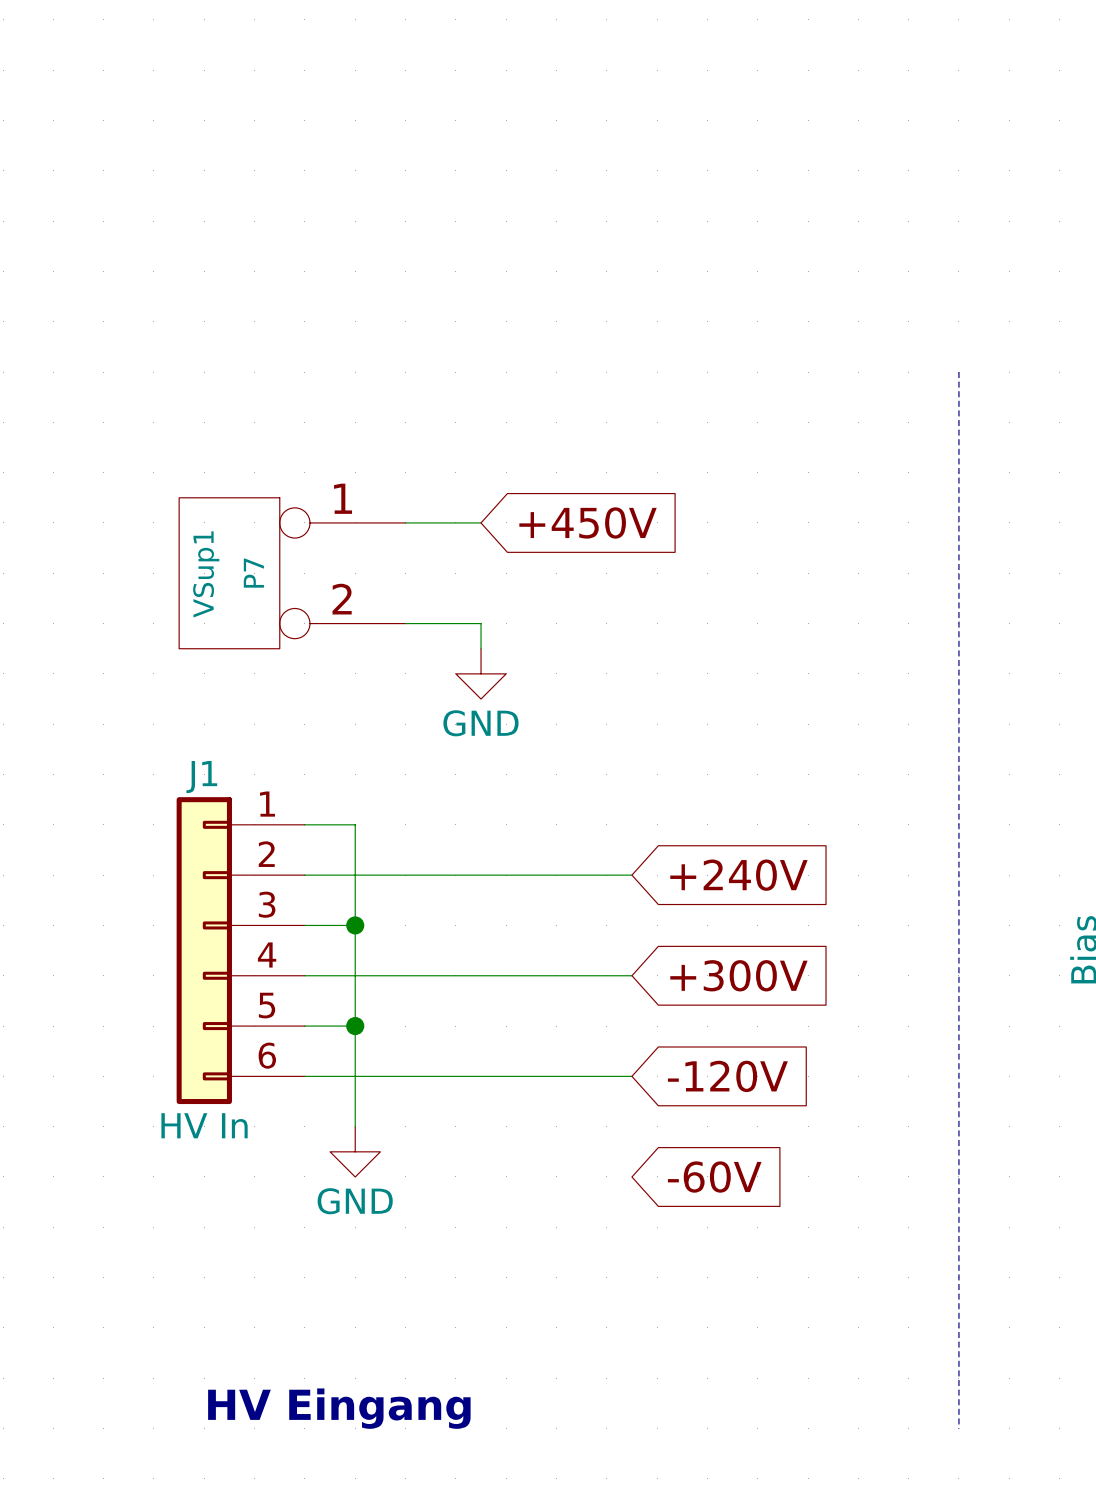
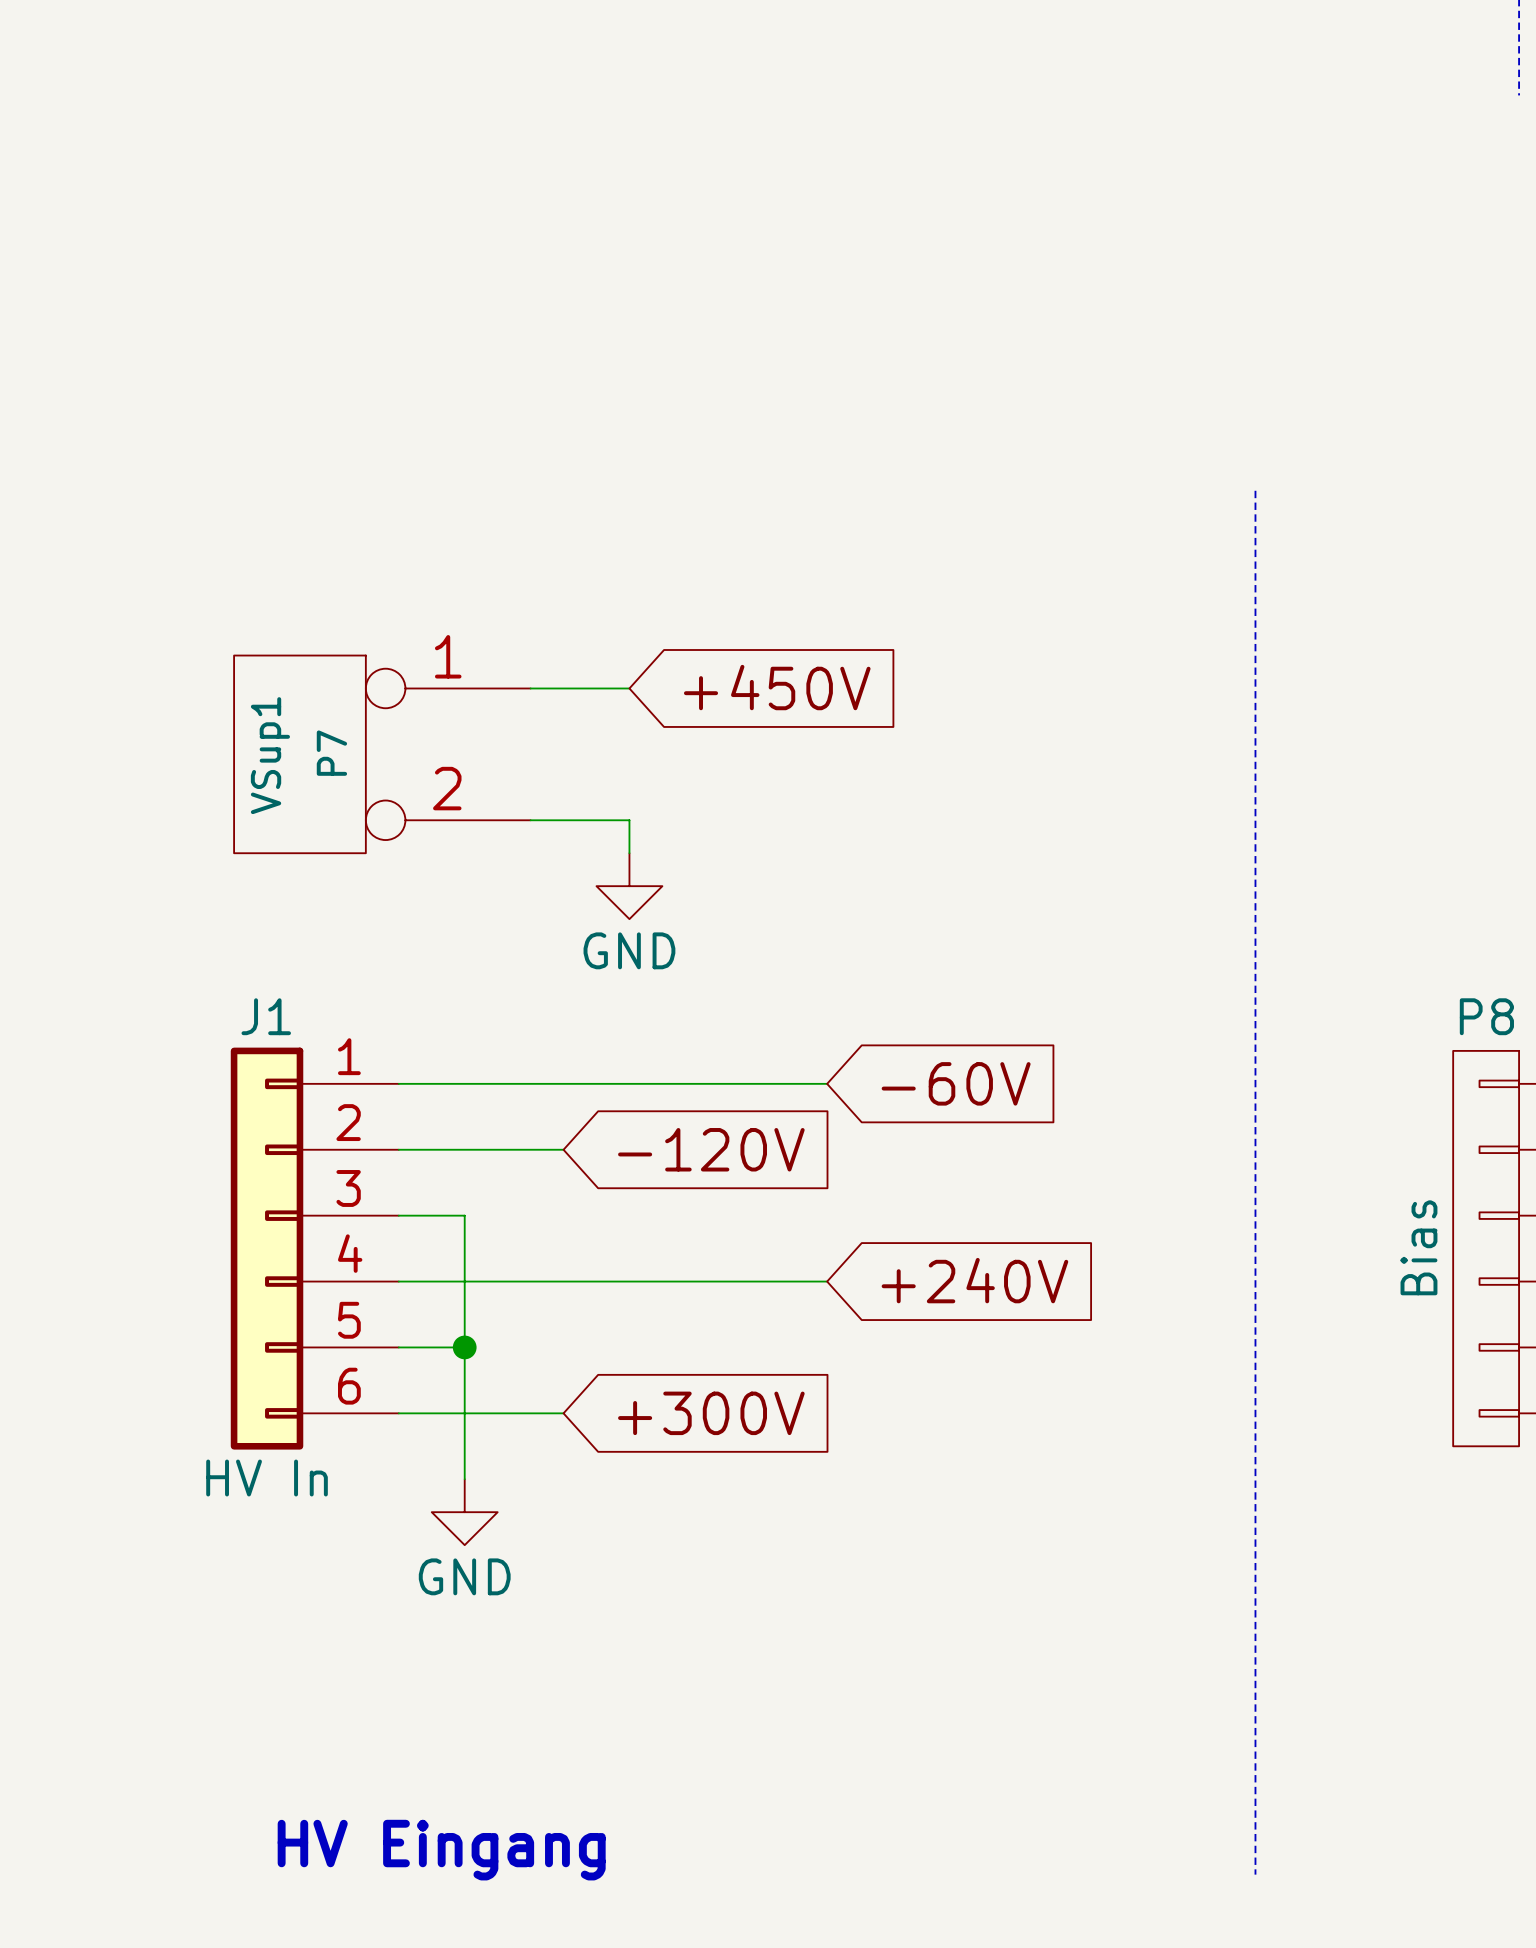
wire: (355, 824) (355, 925) -> (464, 1083) (827, 1083)
wire: (430, 875) (631, 875) -> none
global label: +240V (738, 875) -> none
junction: (355, 925) -> none
global label: +300V (738, 975) -> +240V (974, 1280)
wire: (430, 1076) (631, 1076) -> none
global label: none -> +300V (711, 1413)
global label position: -120V (727, 1076) -> -120V (711, 1149)
global label position: -60V (714, 1177) -> -60V (956, 1083)

